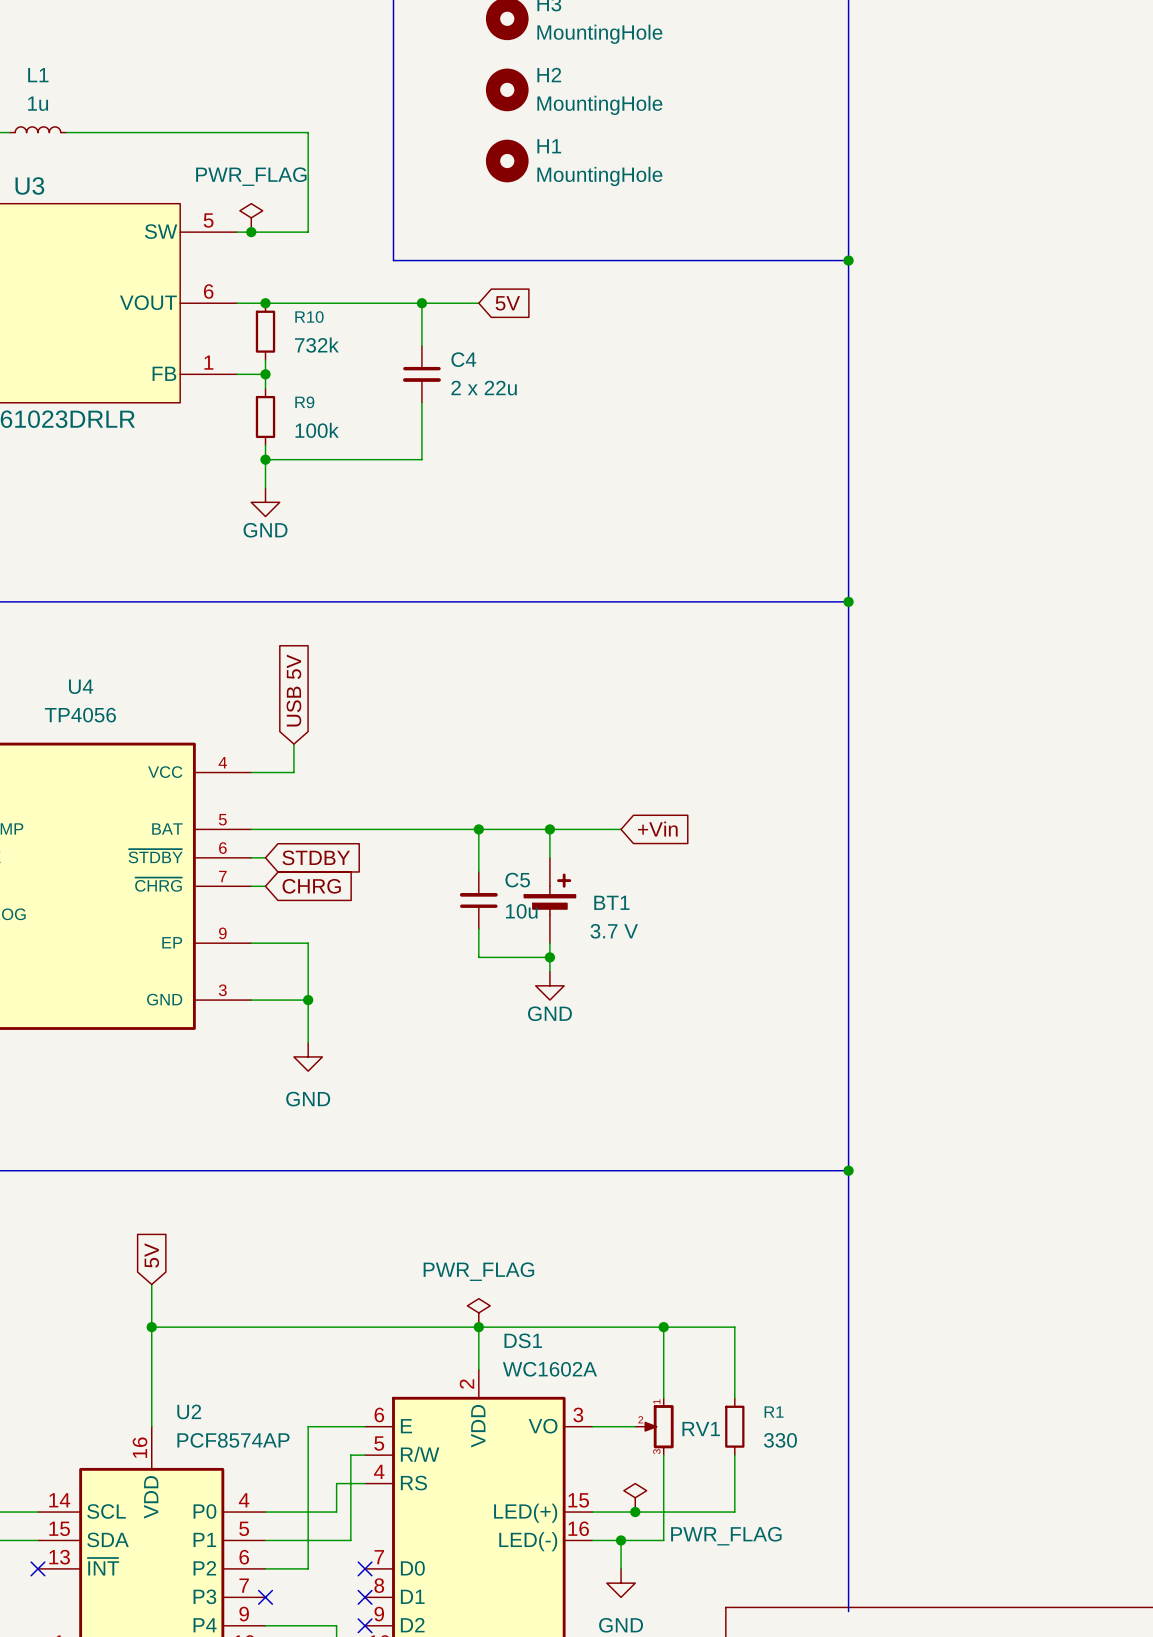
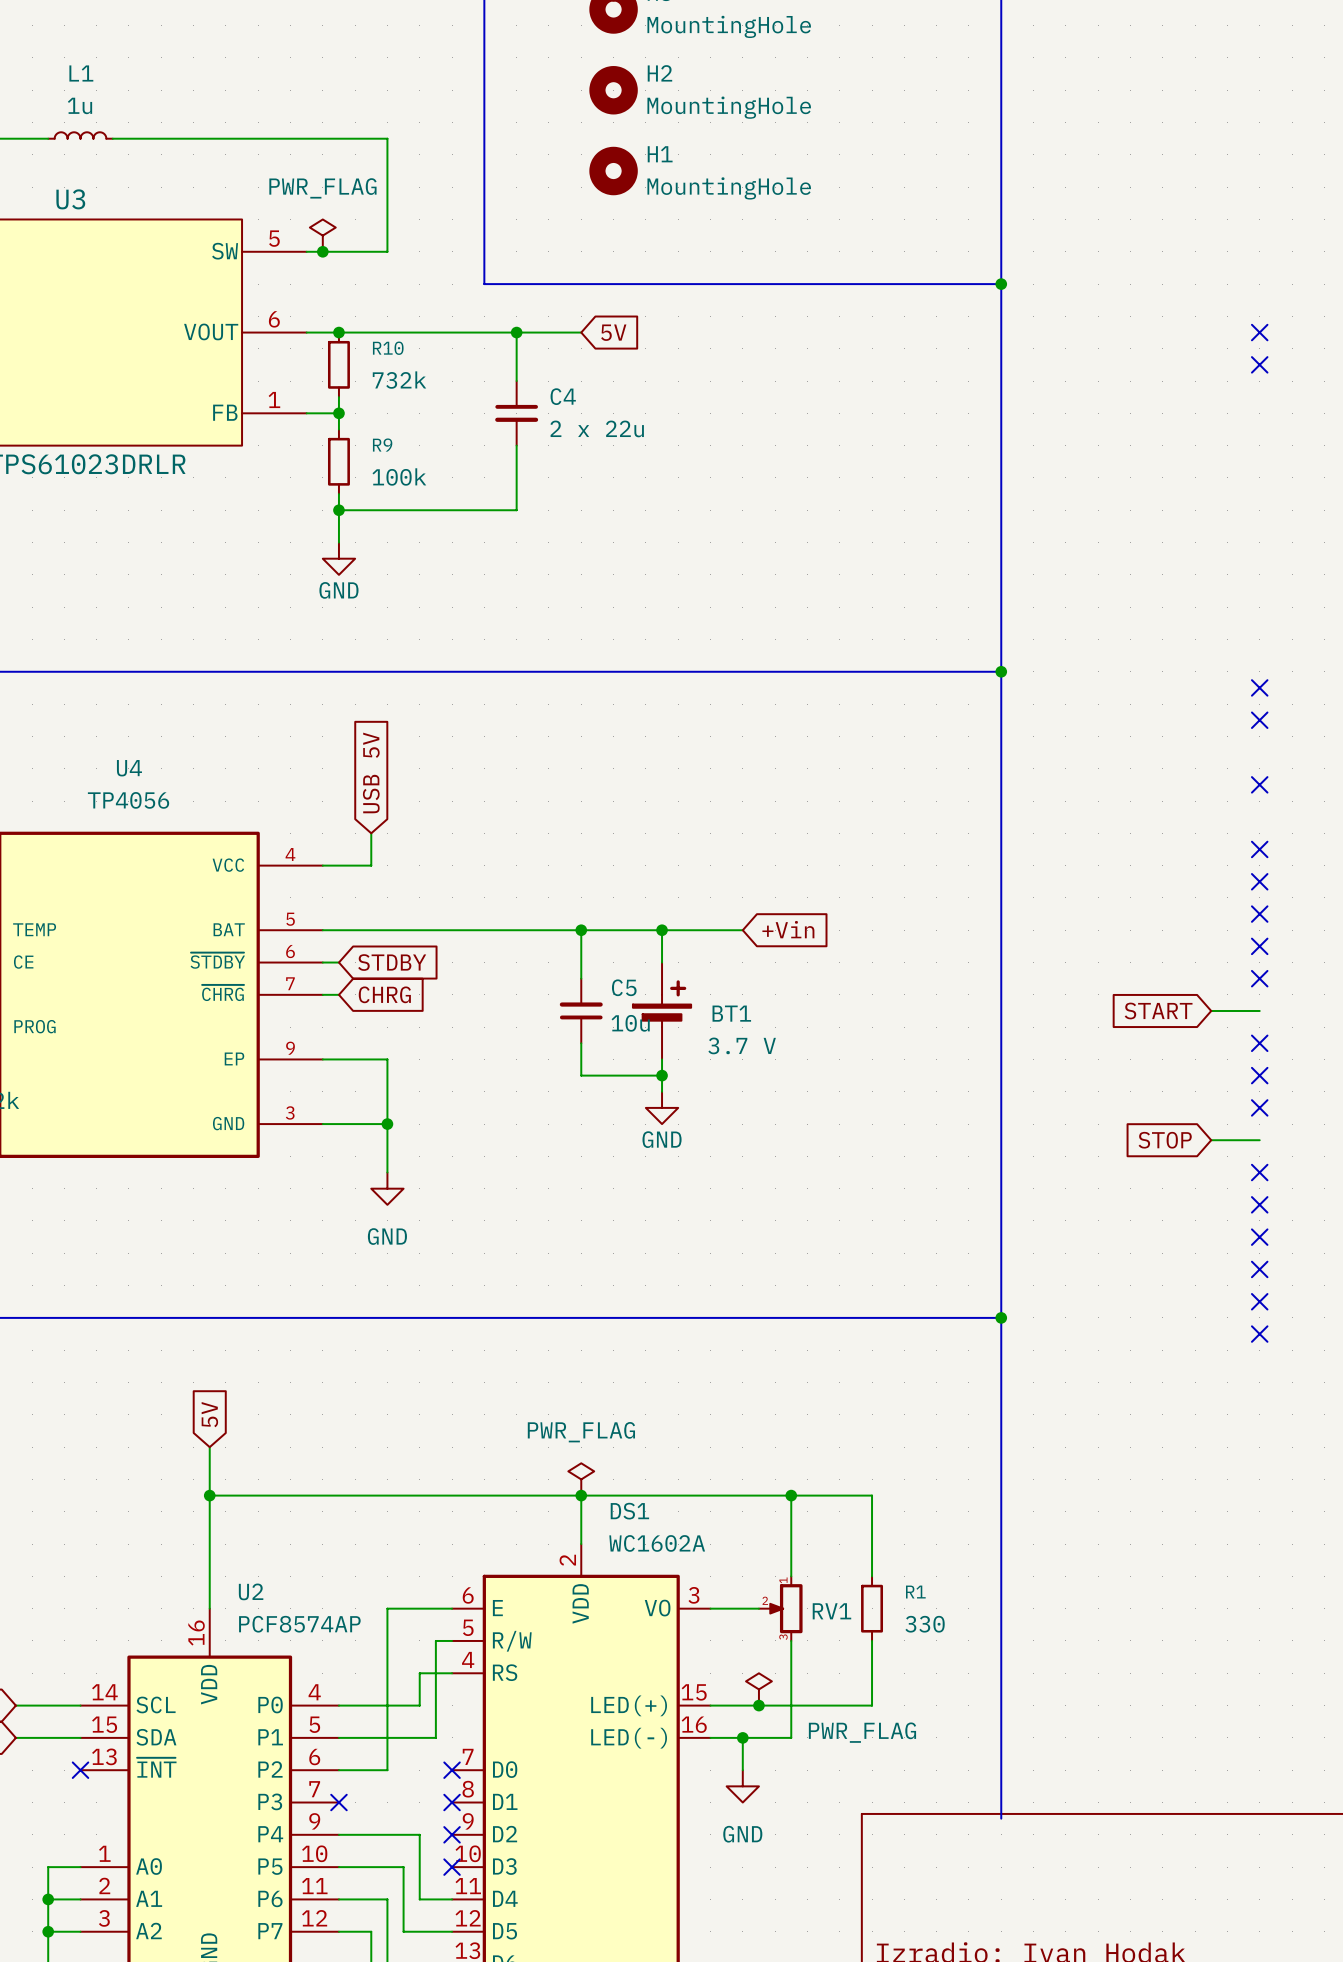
no-connect mark: none -> (1259, 332)
no-connect mark: none -> (1259, 364)
no-connect mark: none -> (1259, 687)
no-connect mark: none -> (1259, 720)
no-connect mark: none -> (1259, 784)
no-connect mark: none -> (1259, 849)
no-connect mark: none -> (1259, 881)
no-connect mark: none -> (1259, 914)
no-connect mark: none -> (1259, 946)
no-connect mark: none -> (1259, 978)
global label: none -> START (1158, 1010)
wire: none -> (1211, 1010) (1259, 1010)
no-connect mark: none -> (1259, 1043)
no-connect mark: none -> (1259, 1075)
no-connect mark: none -> (1259, 1107)
global label: none -> STOP (1165, 1140)
wire: none -> (1211, 1140) (1259, 1140)
no-connect mark: none -> (1259, 1172)
no-connect mark: none -> (1259, 1204)
no-connect mark: none -> (1259, 1237)
no-connect mark: none -> (1259, 1269)
no-connect mark: none -> (1259, 1301)
no-connect mark: none -> (1259, 1334)

